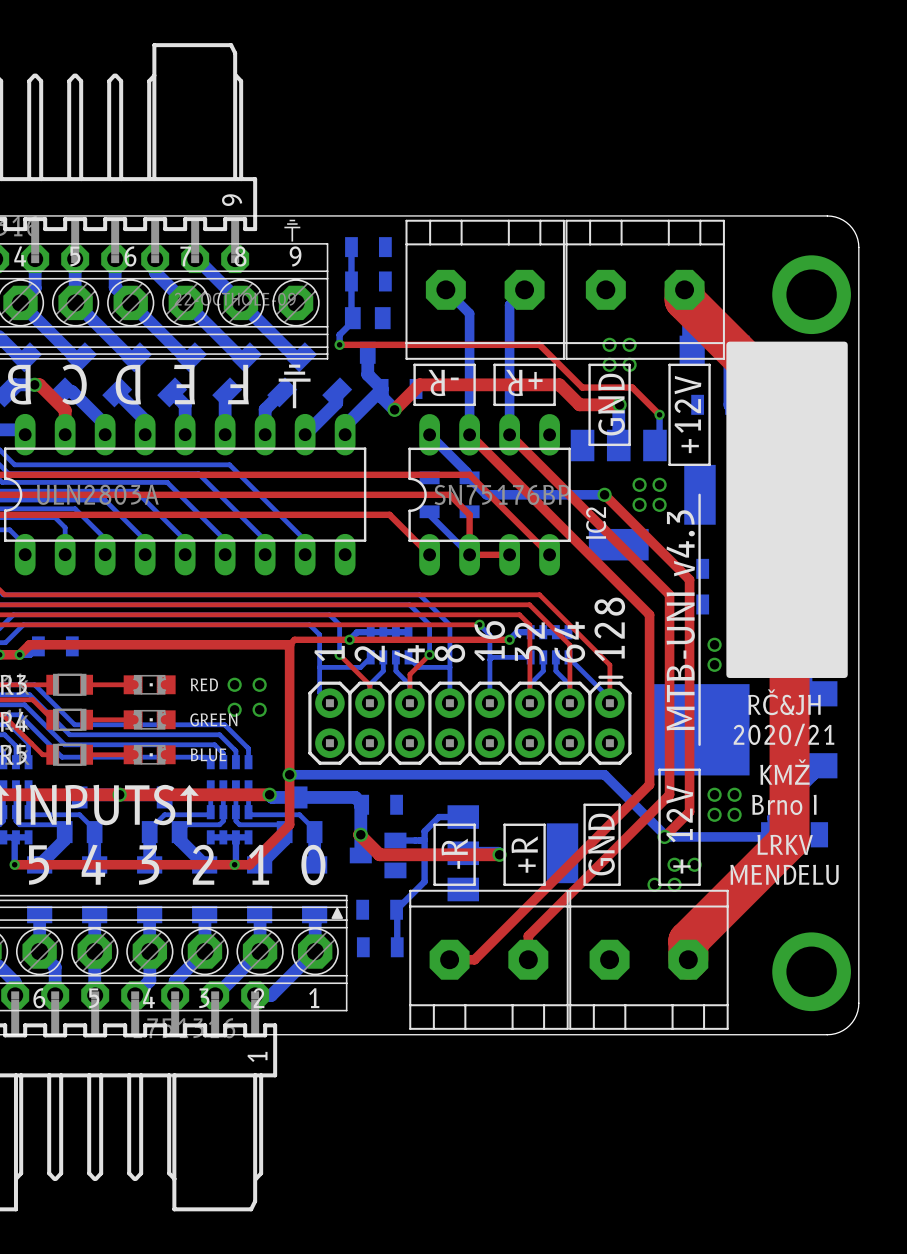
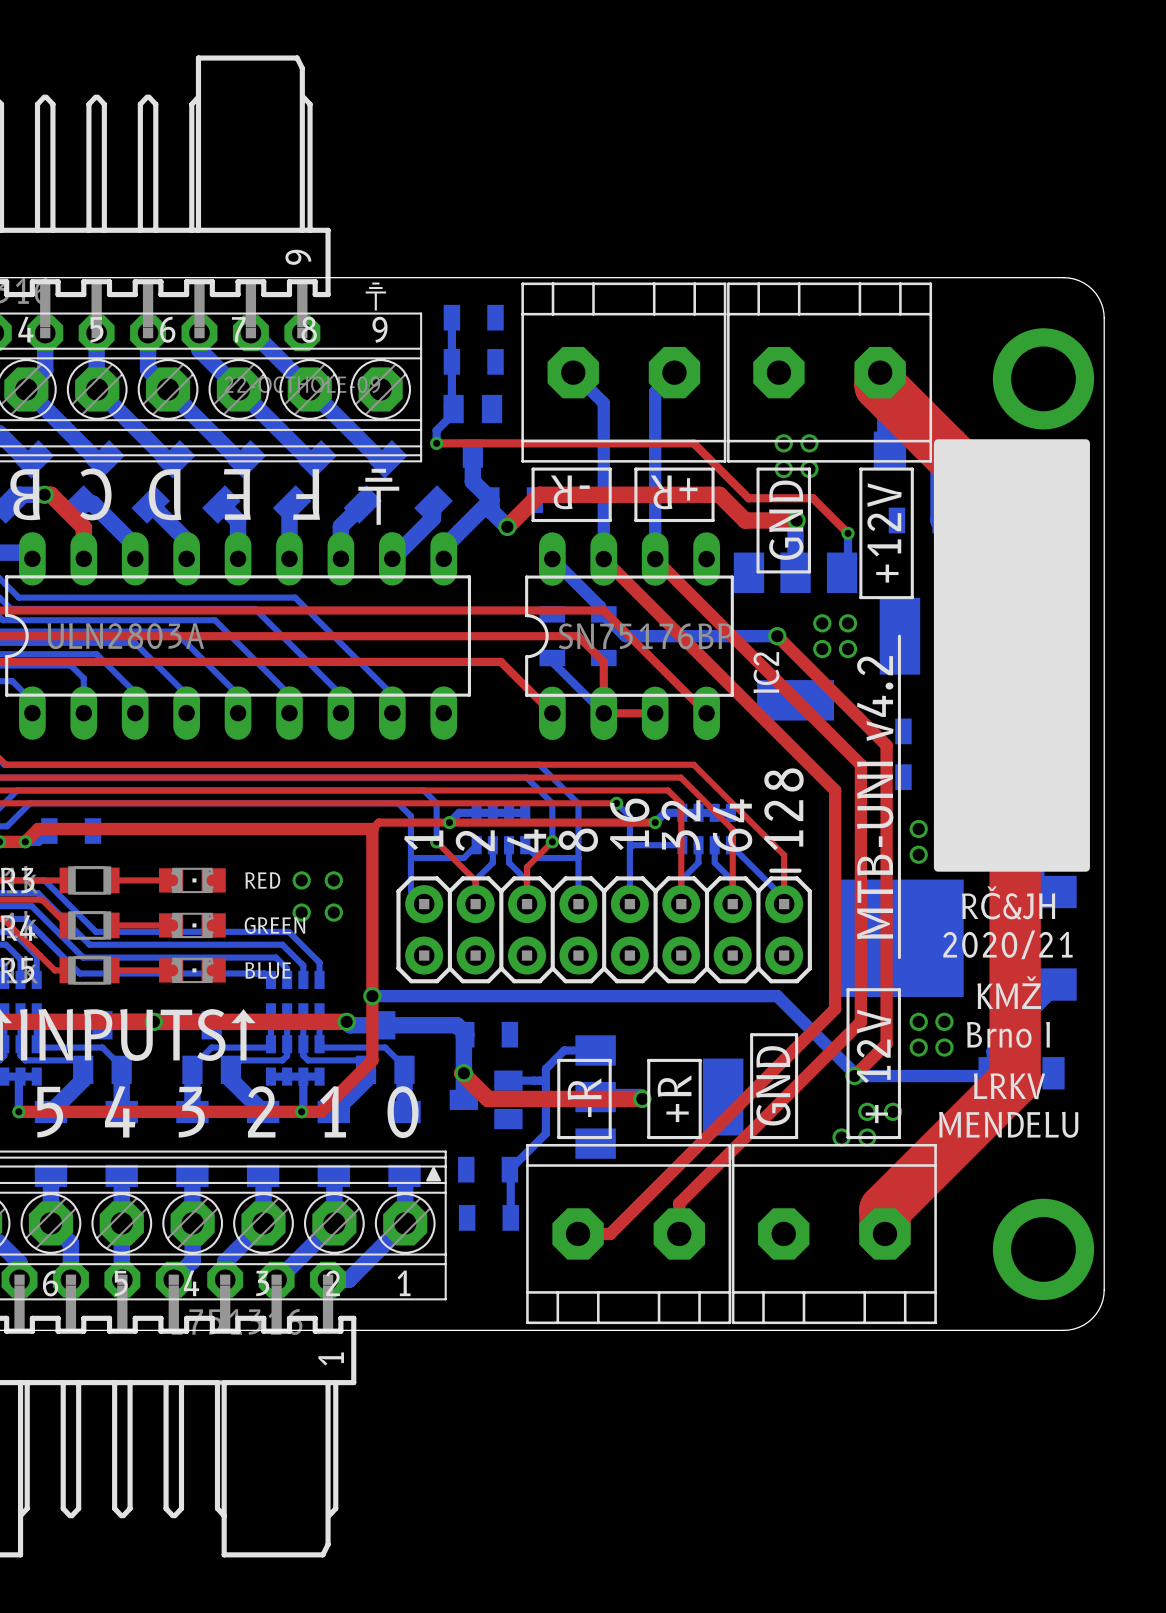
text: MTB-UNI v4.3 (680, 620) -> MTB-UNI v4.2 (875, 797)

